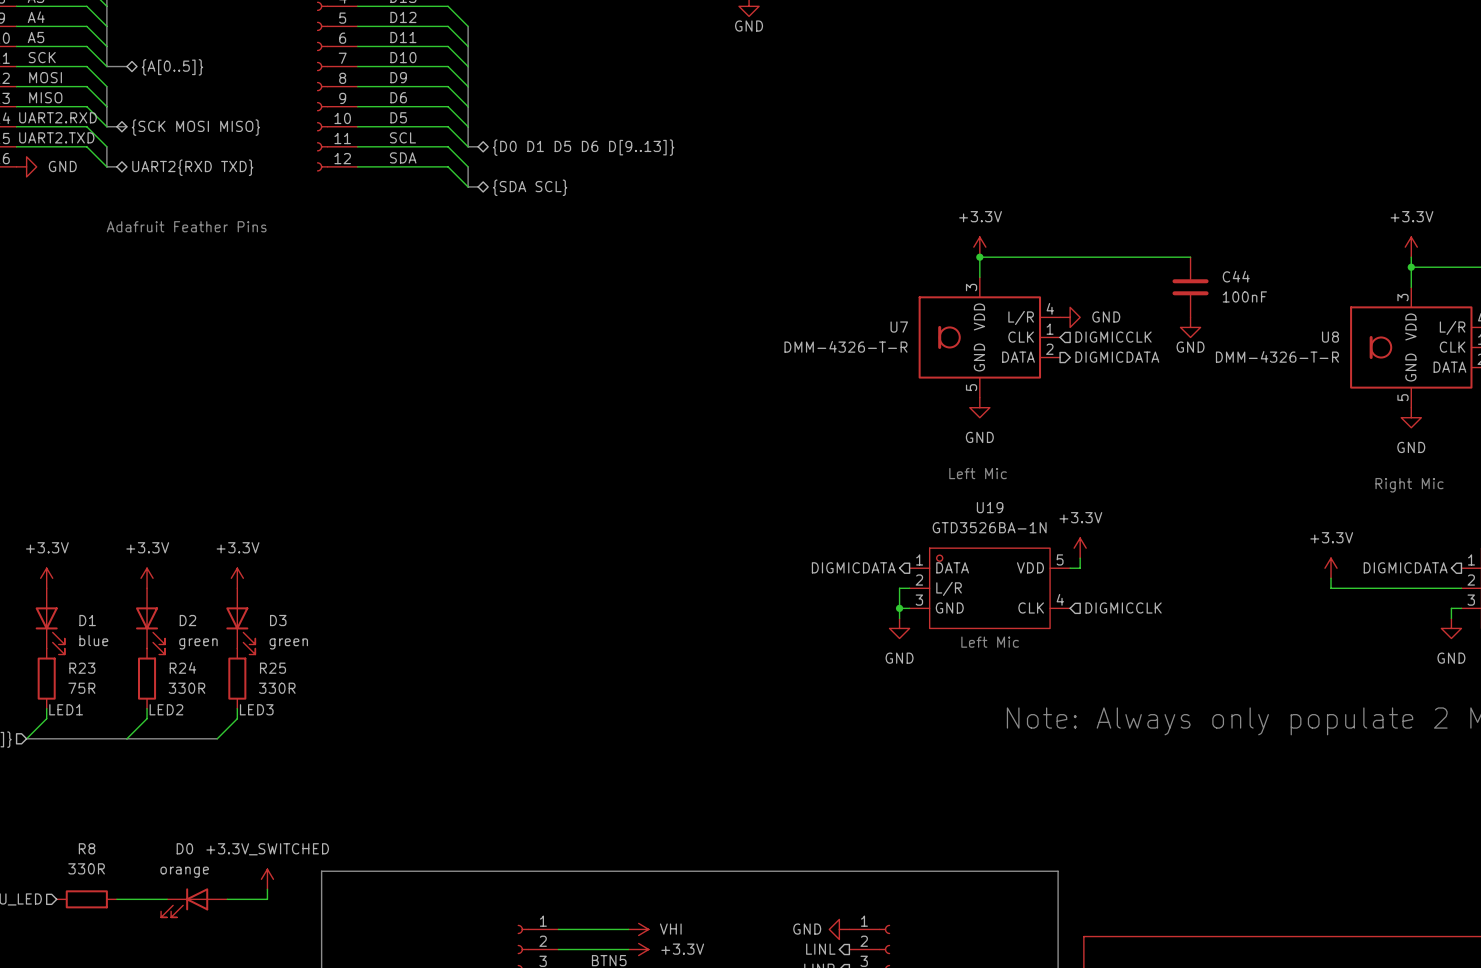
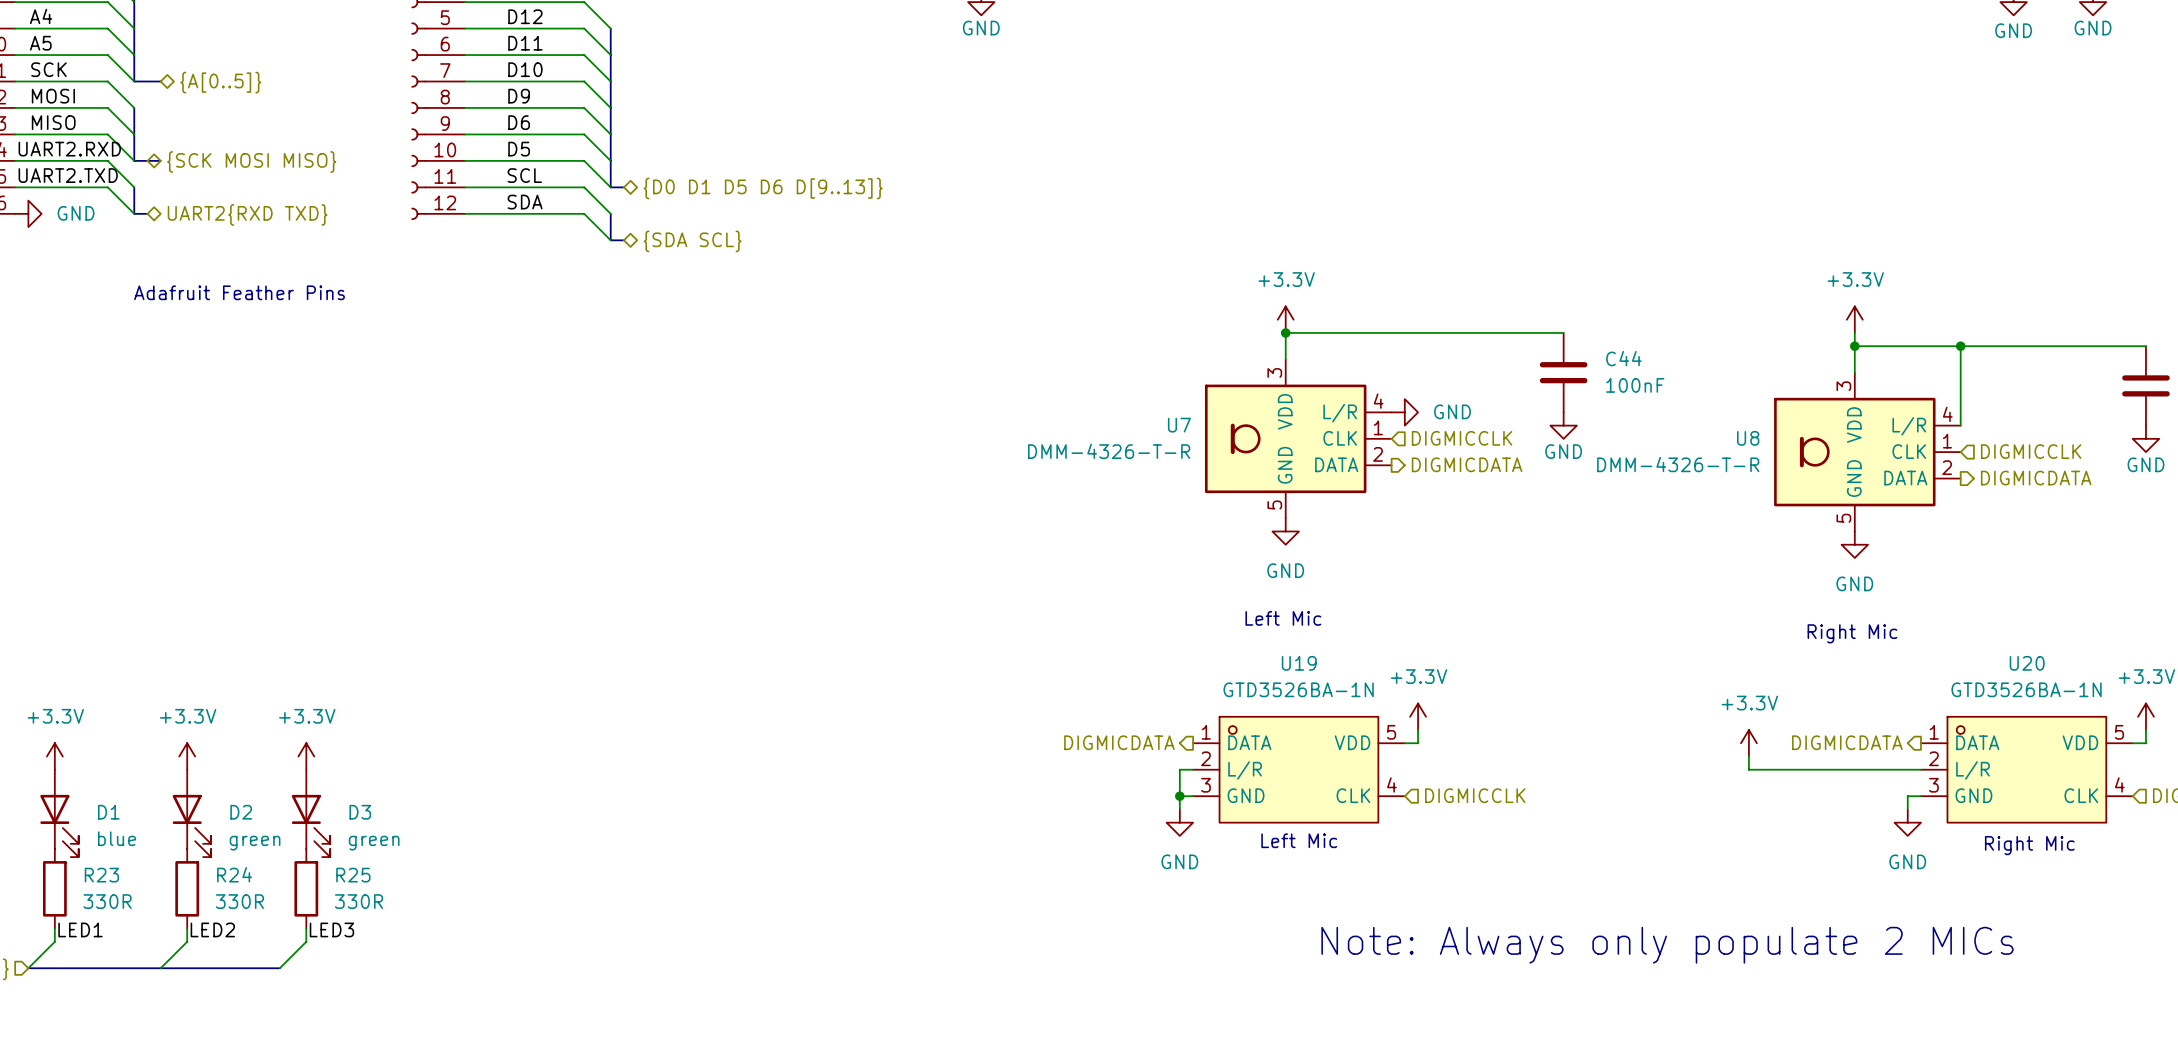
R23 value: 75R (81, 688) -> 330R (107, 901)

